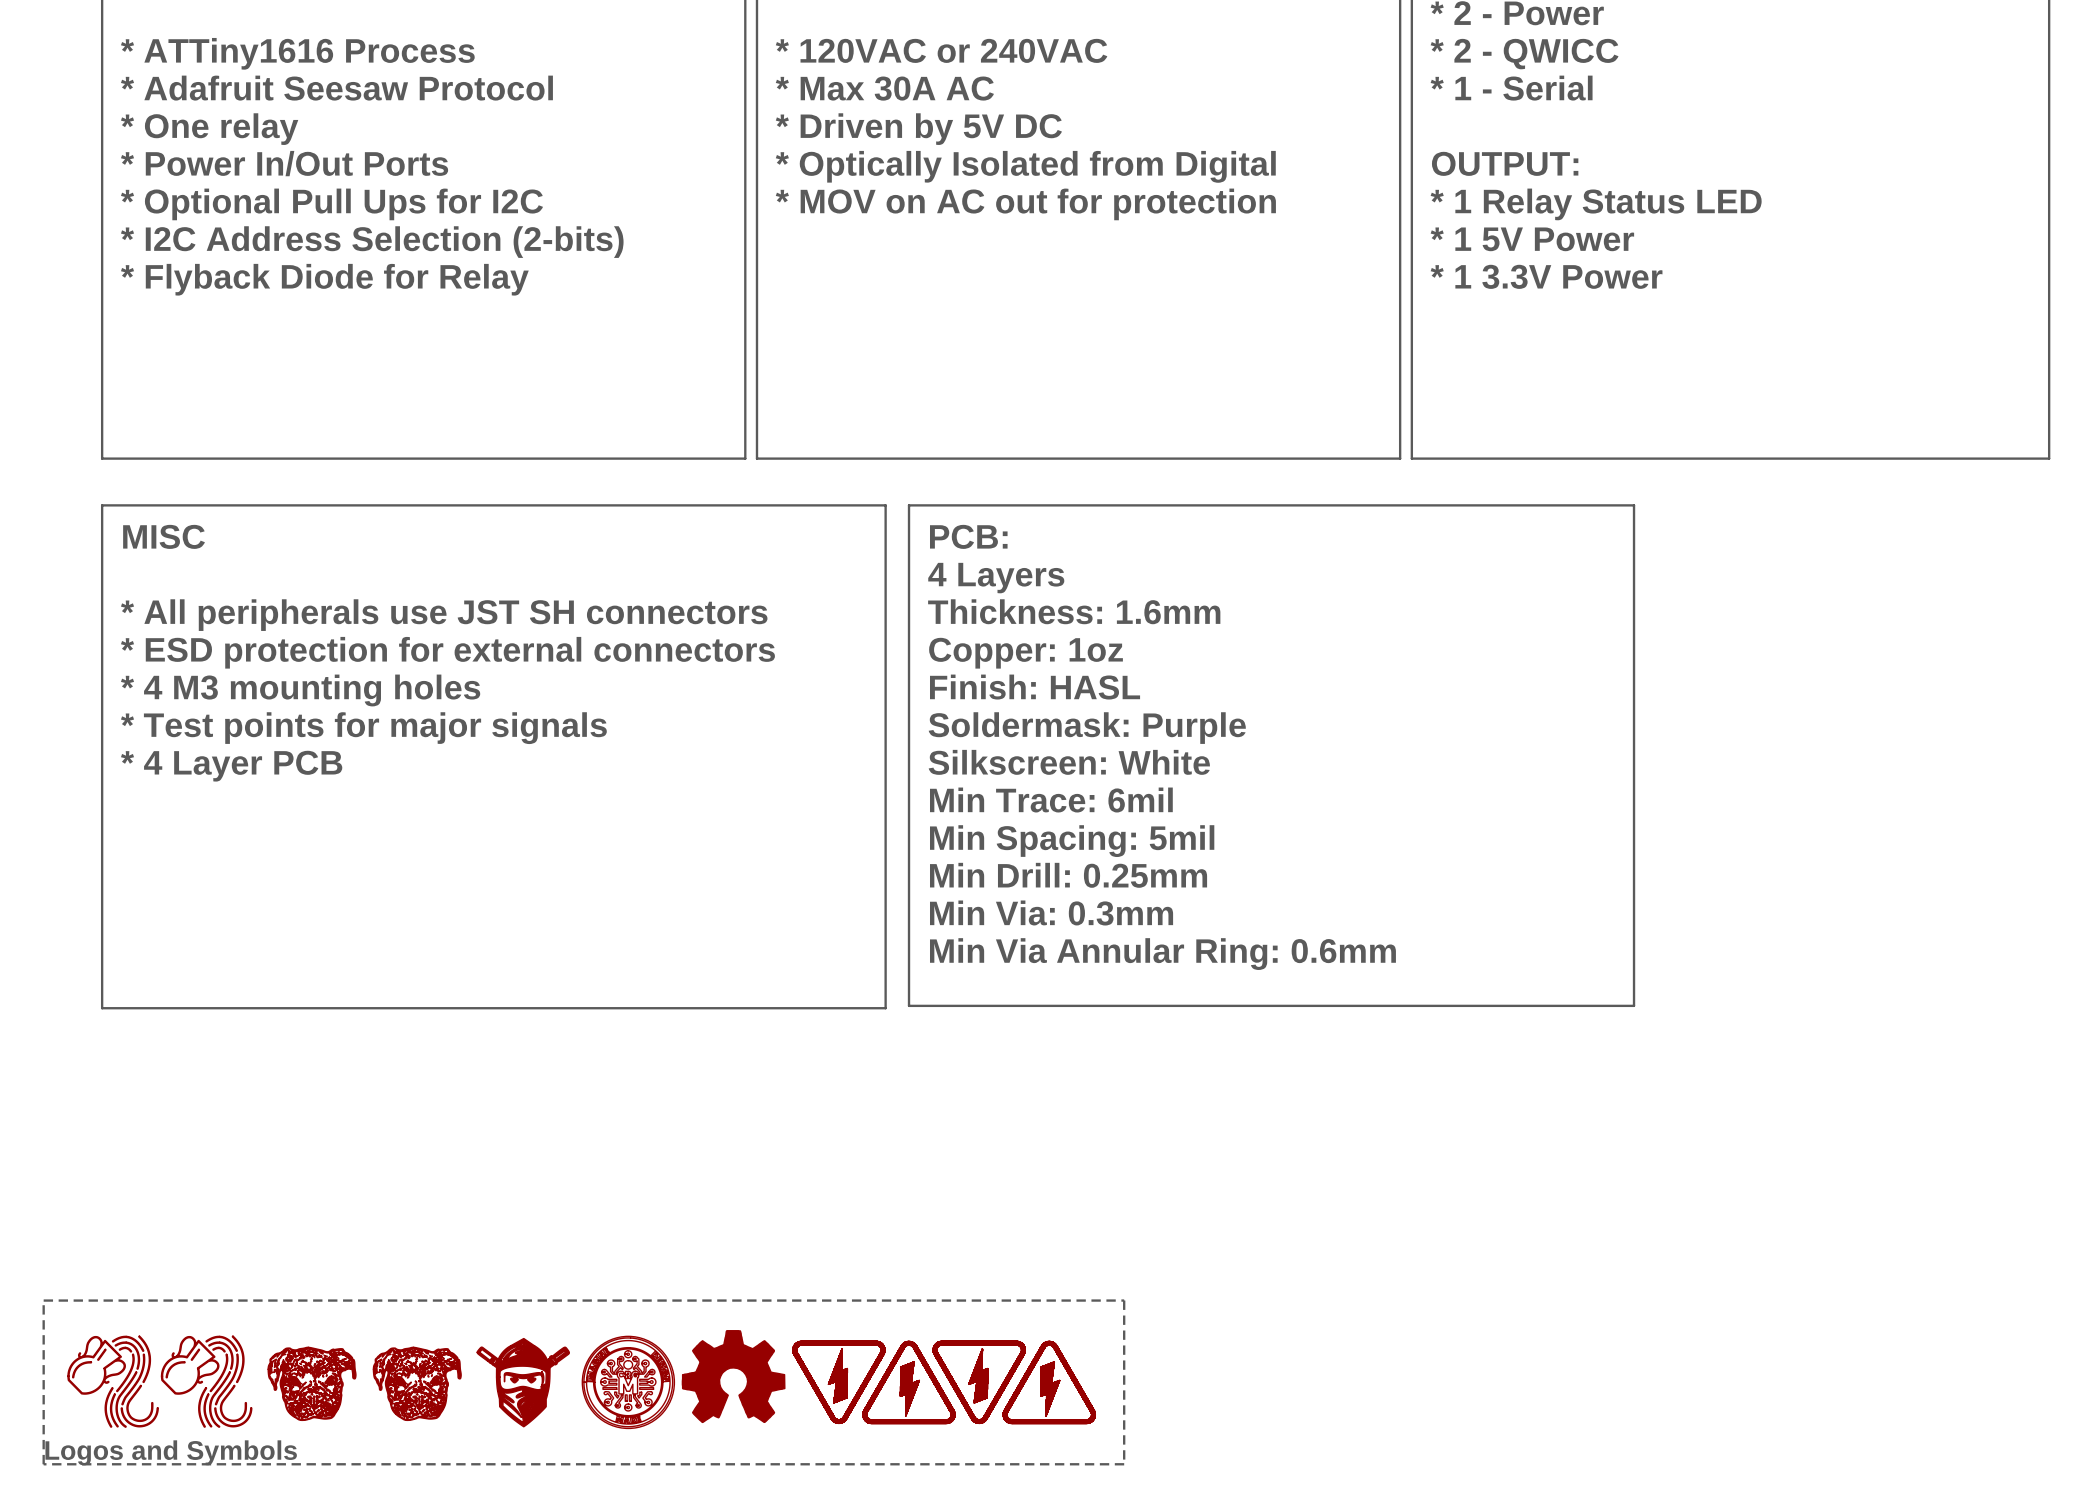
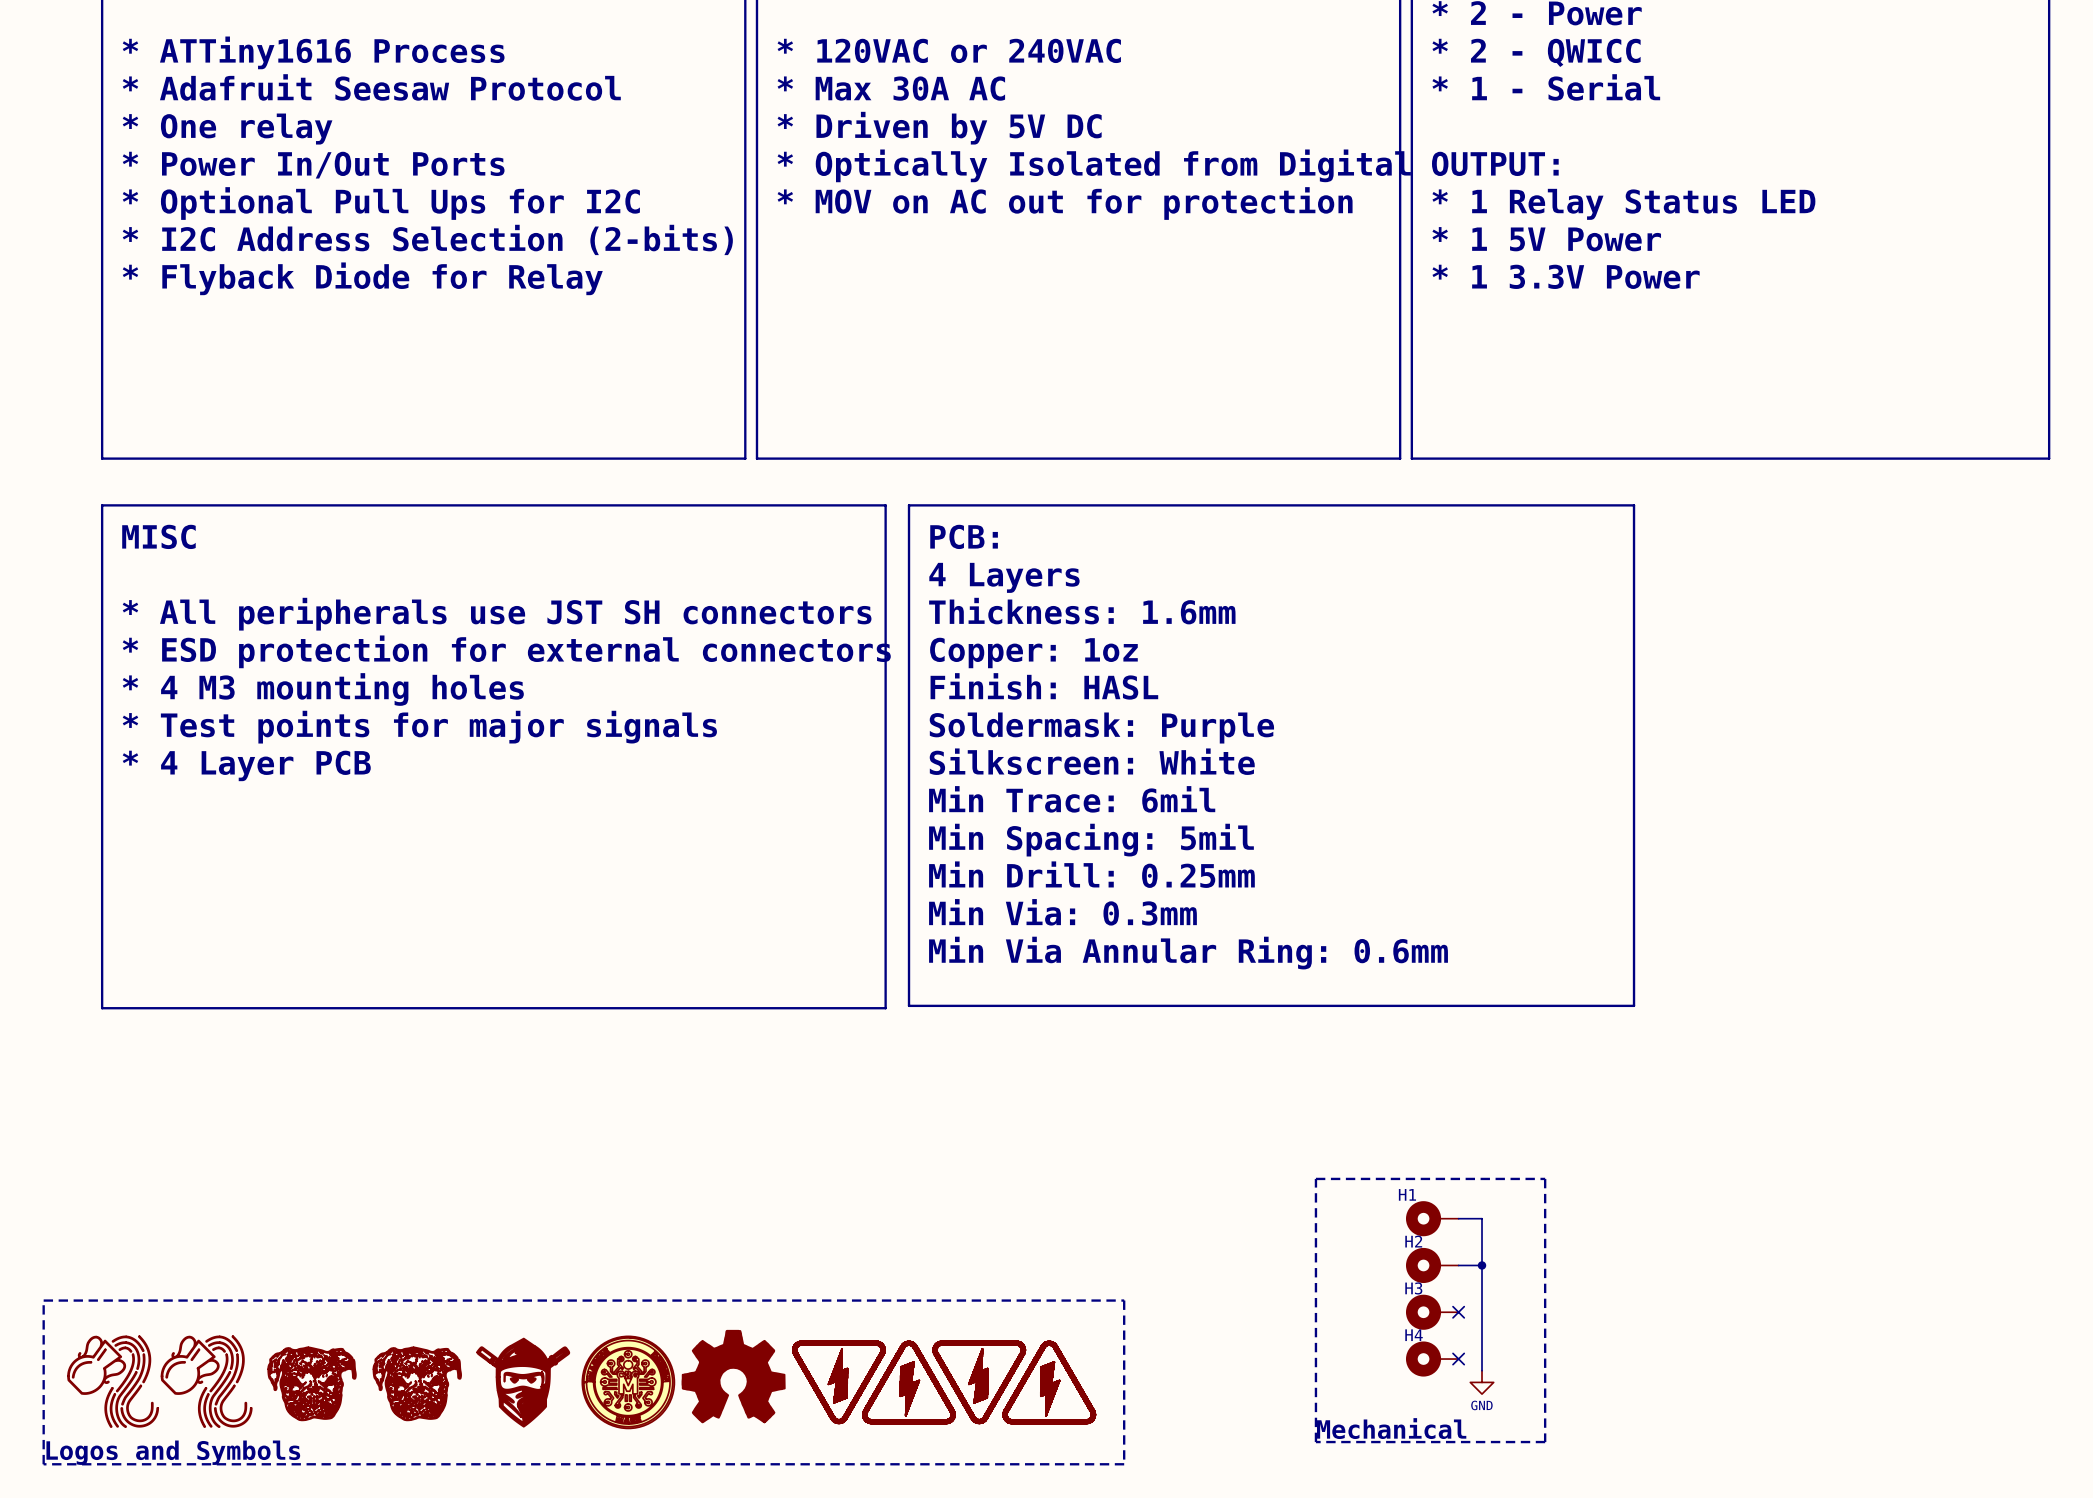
line: none -> (1315, 1178) (1545, 1178) (1545, 1442) (1315, 1442) (1315, 1178)
H1: none -> (1432, 1218)
wire: none -> (1458, 1218) (1482, 1218) (1482, 1370)
H2: none -> (1432, 1265)
wire: none -> (1458, 1265) (1482, 1265)
junction: none -> (1482, 1265)
H3: none -> (1432, 1312)
no-connect mark: none -> (1458, 1312)
H4: none -> (1432, 1359)
no-connect mark: none -> (1458, 1359)
power symbol: none -> GND (1482, 1382)
text: none -> Mechanical (1391, 1428)

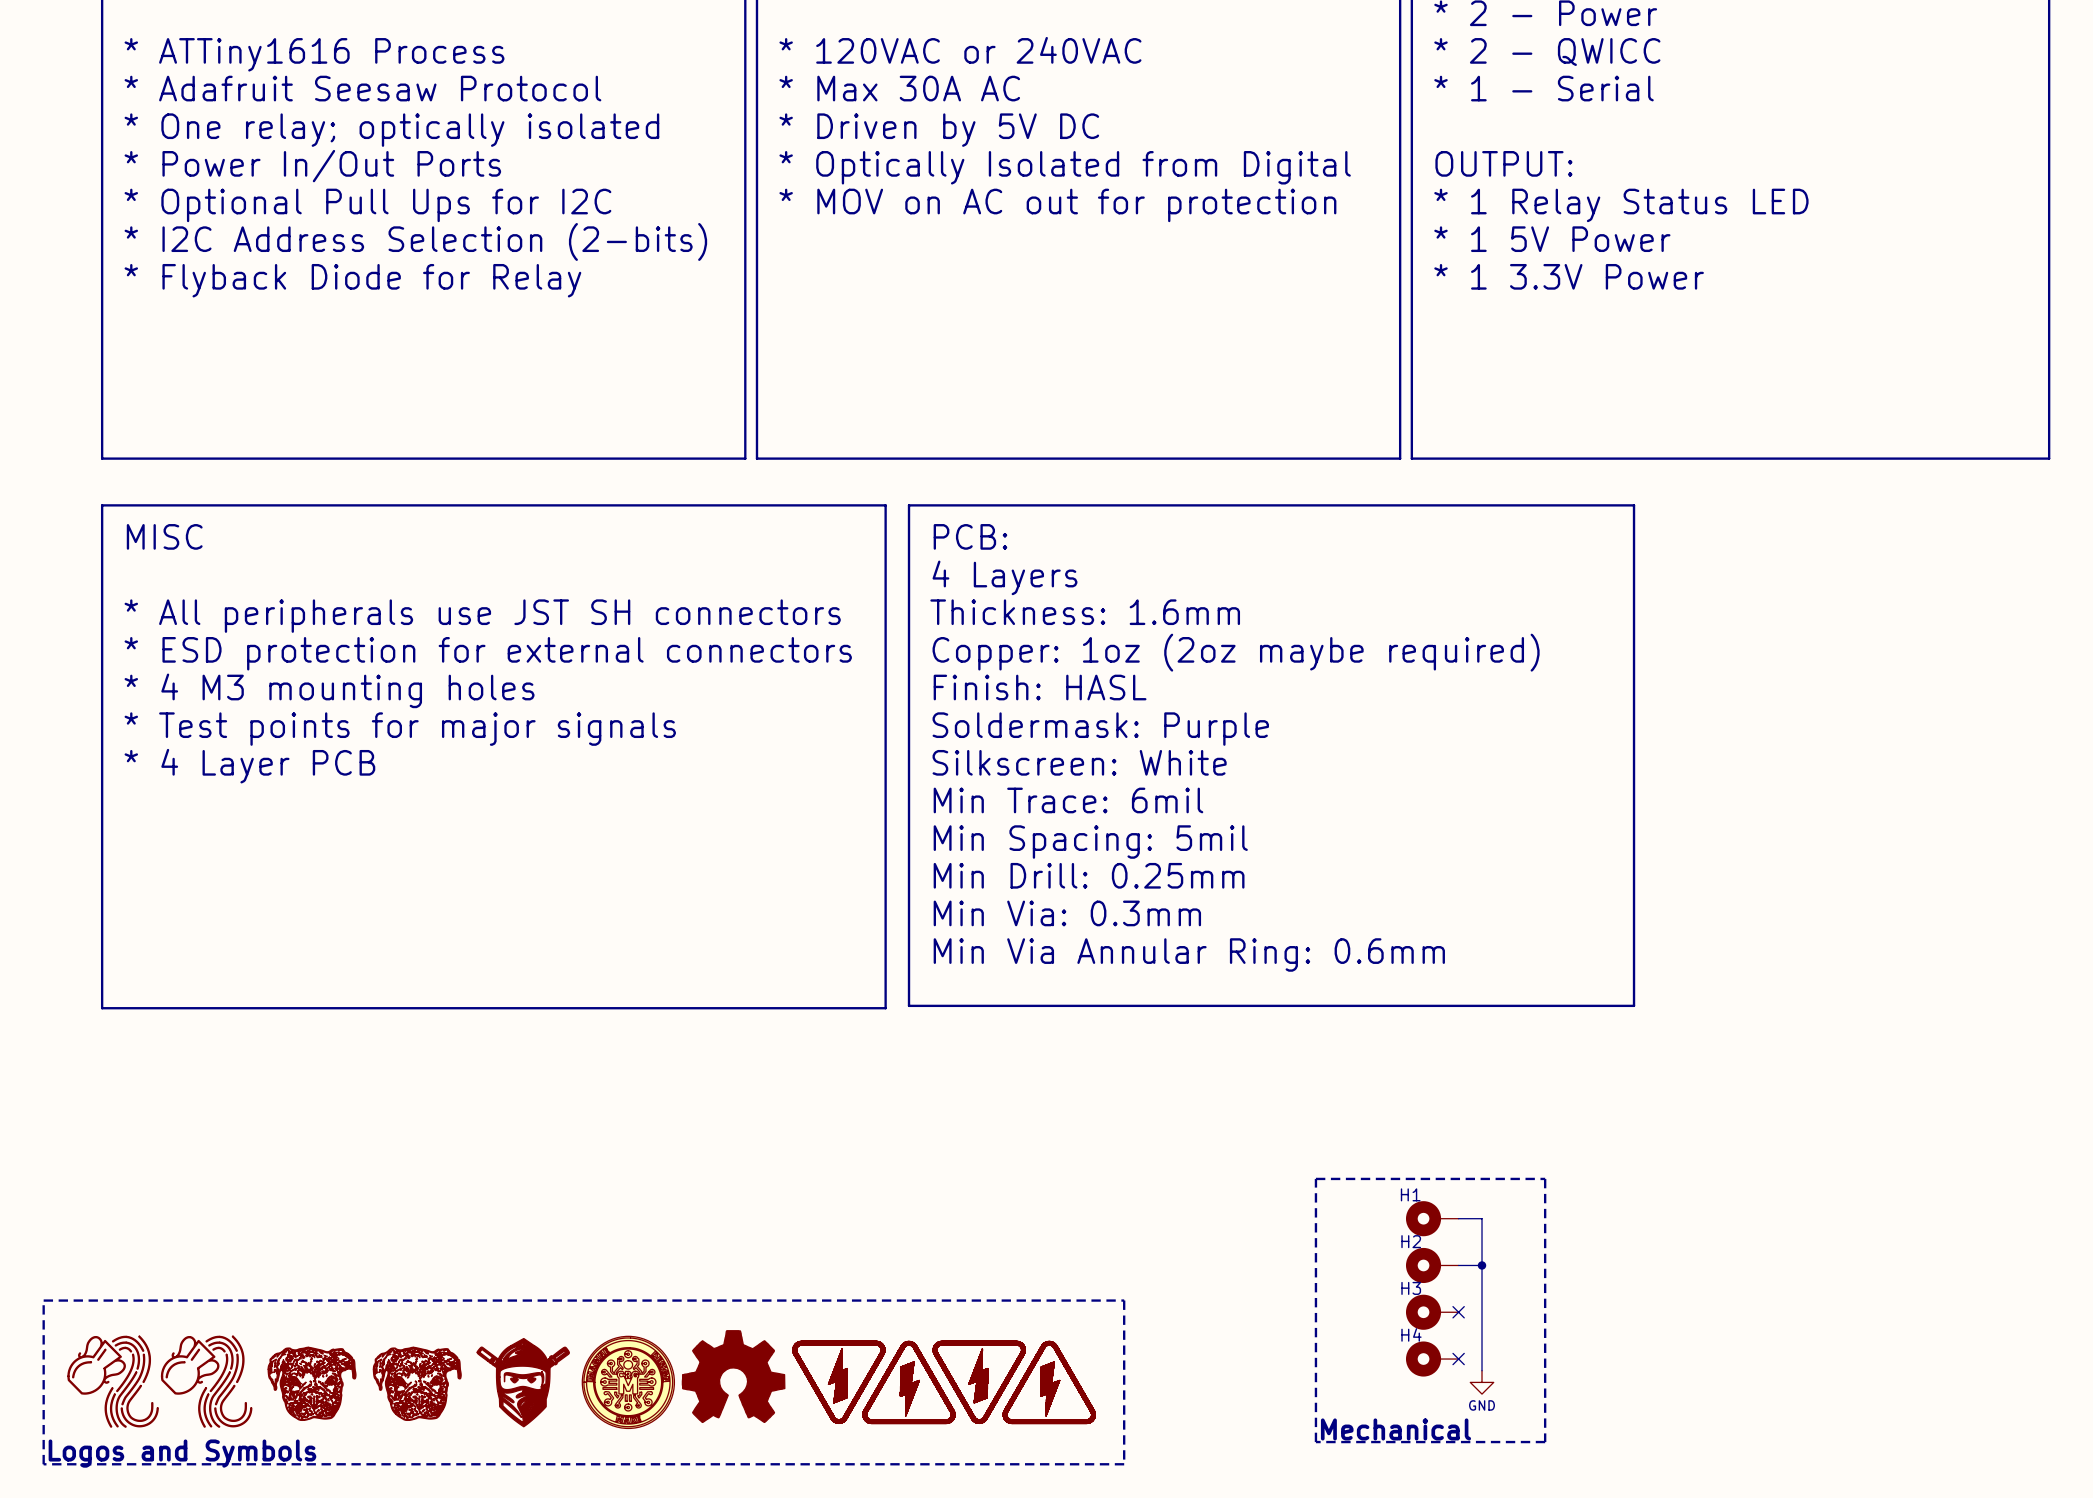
text: * One relay (227, 129) -> * One relay; optically isolated (391, 130)
text: Copper: 1oz (1033, 652) -> Copper: 1oz (2oz maybe required) (1236, 652)

